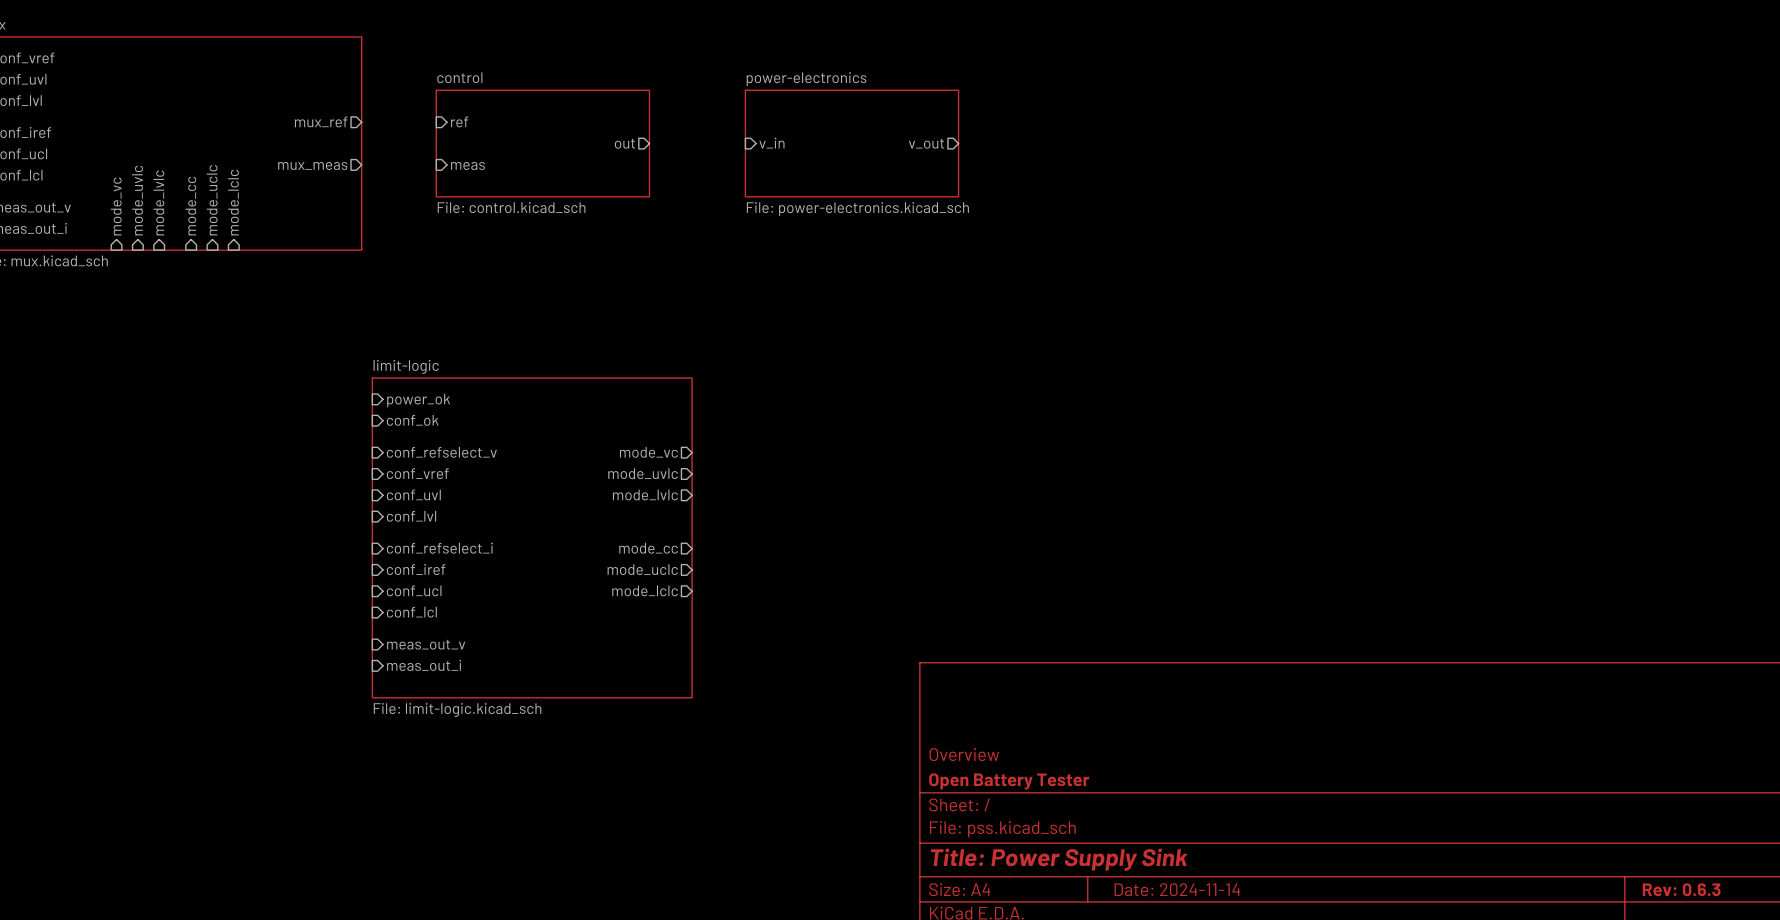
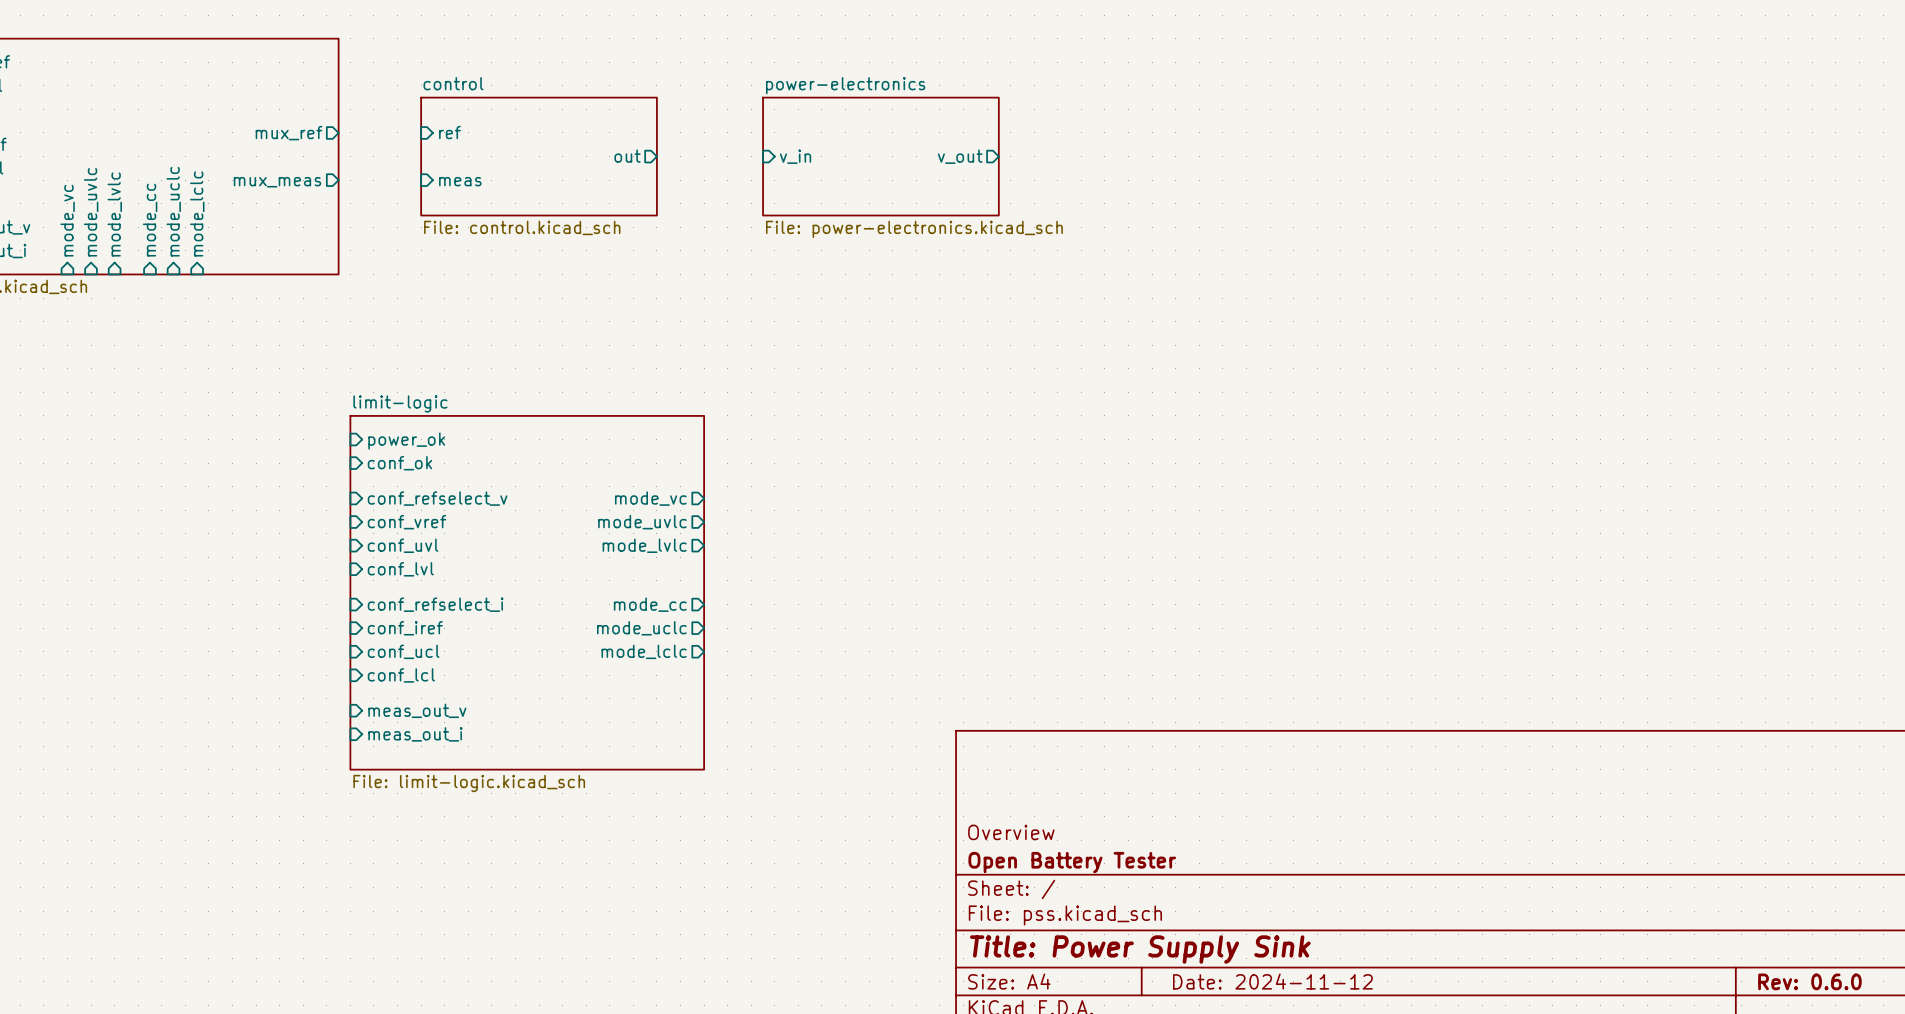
title block: Date: 2024-11-14 (1177, 889) -> Date: 2024-11-12 (1272, 981)
title block: Rev: 0.6.3 (1681, 889) -> Rev: 0.6.0 (1809, 981)

